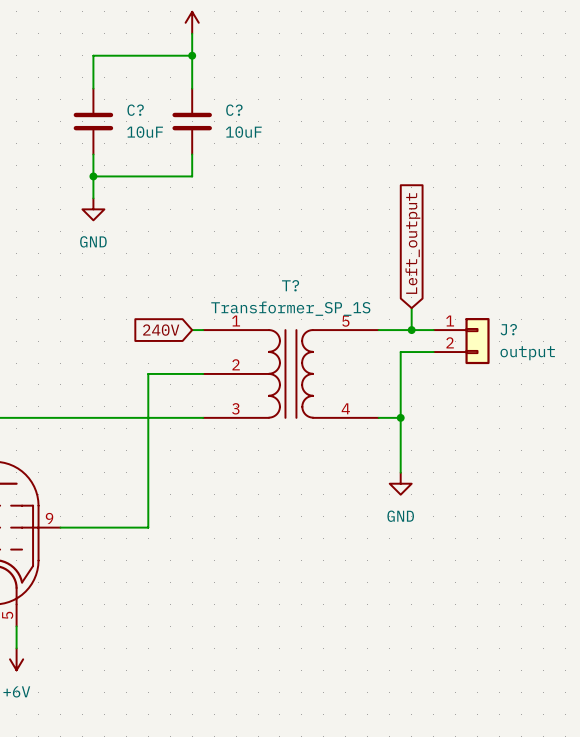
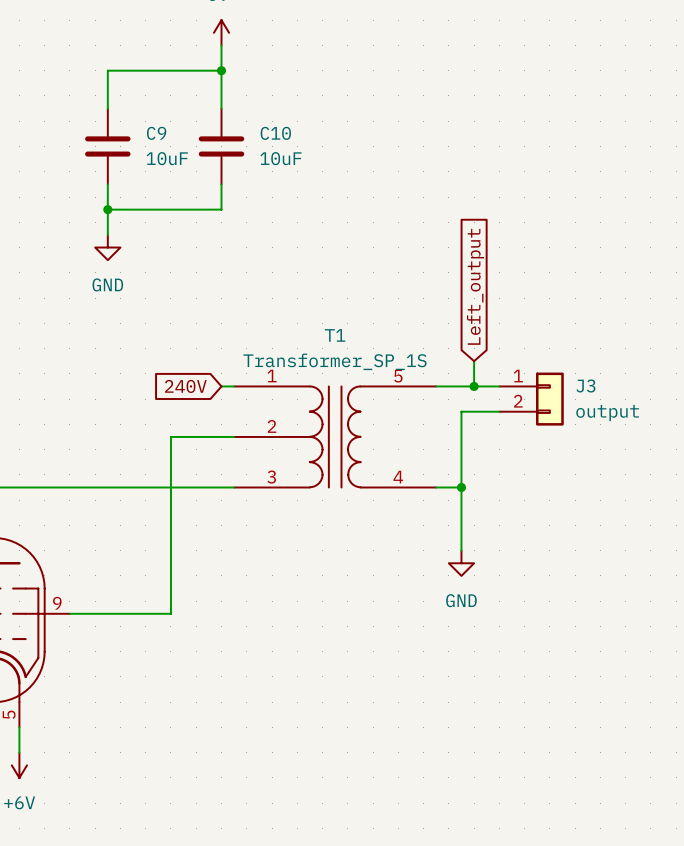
C? name: C? (135, 110) -> C9 (156, 133)
C? name: C? (234, 110) -> C10 (275, 133)
T? name: T? (290, 285) -> T1 (335, 335)
J? name: J? (508, 329) -> J3 (585, 385)

